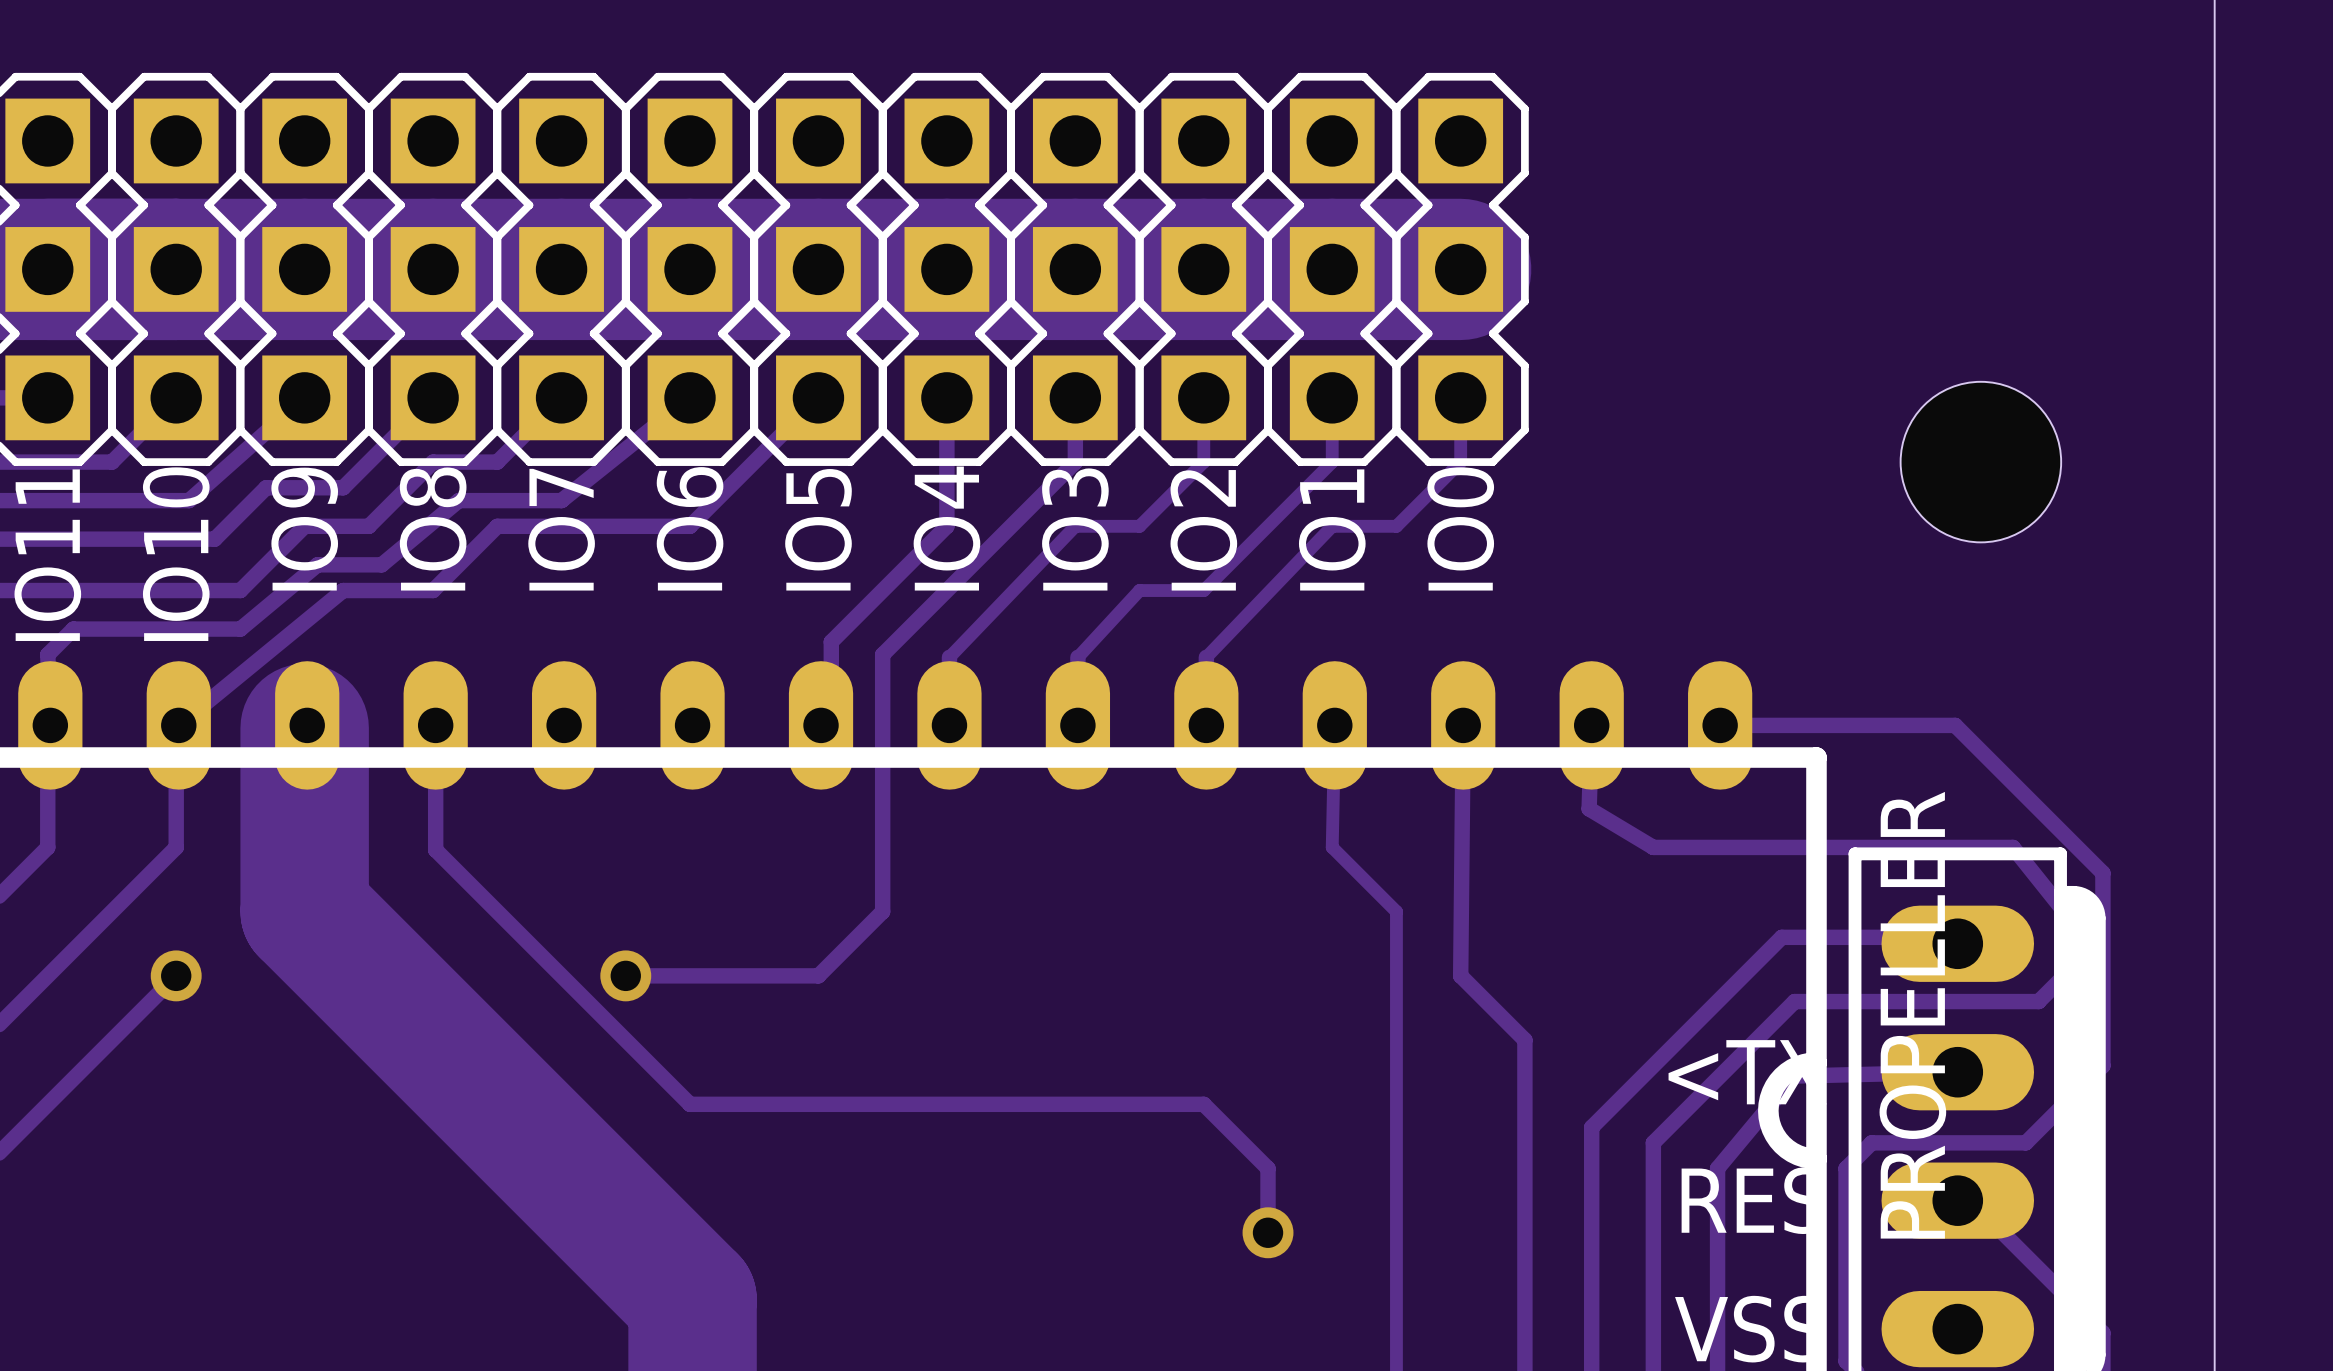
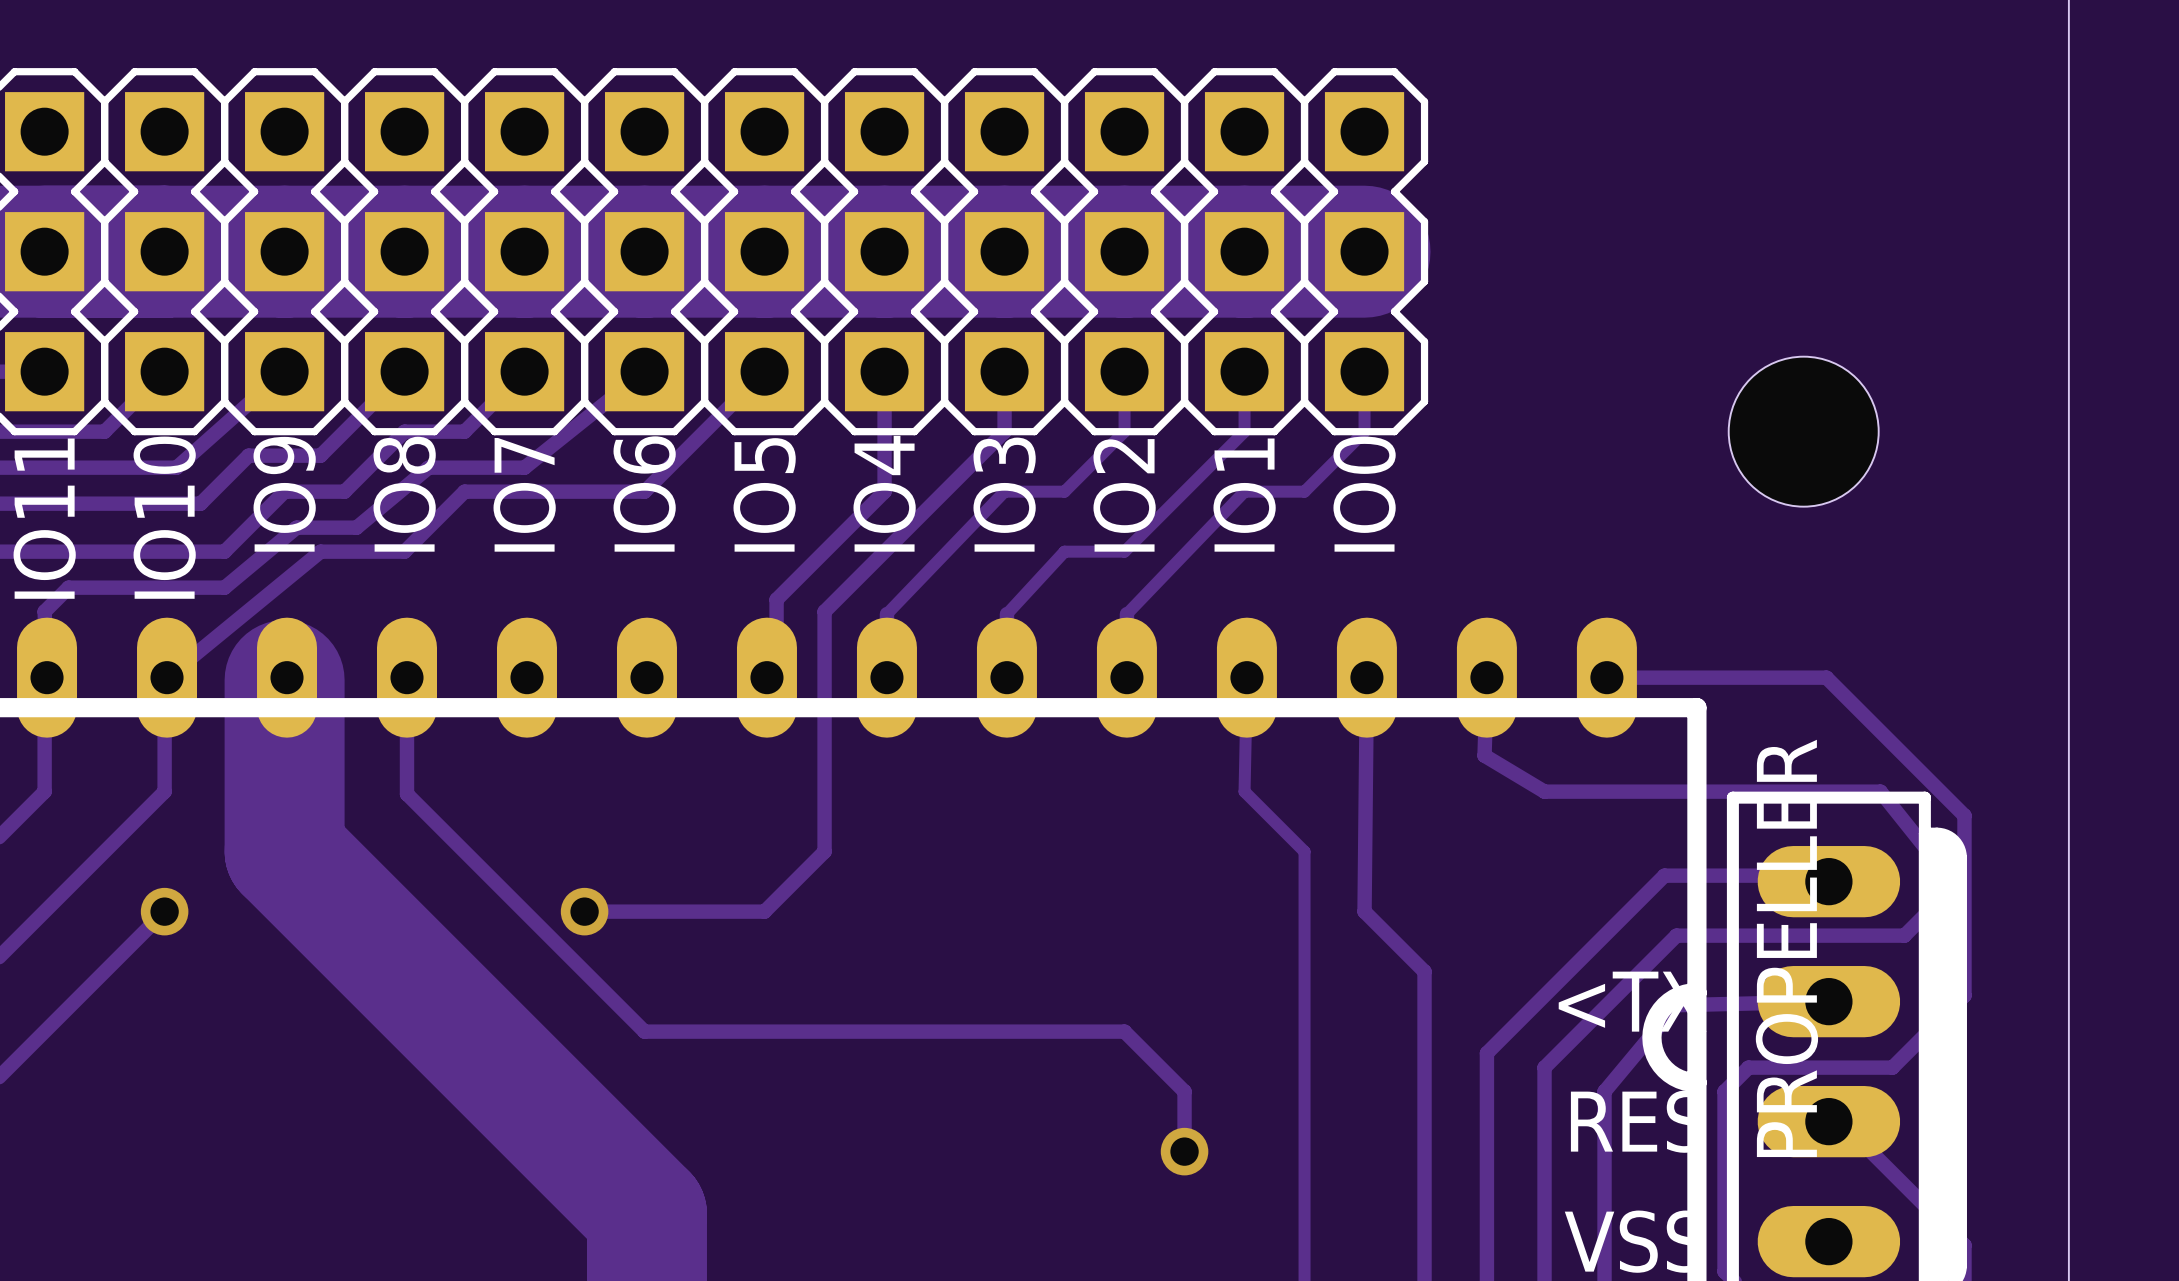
hole position: (1980, 462) -> (1803, 431)

